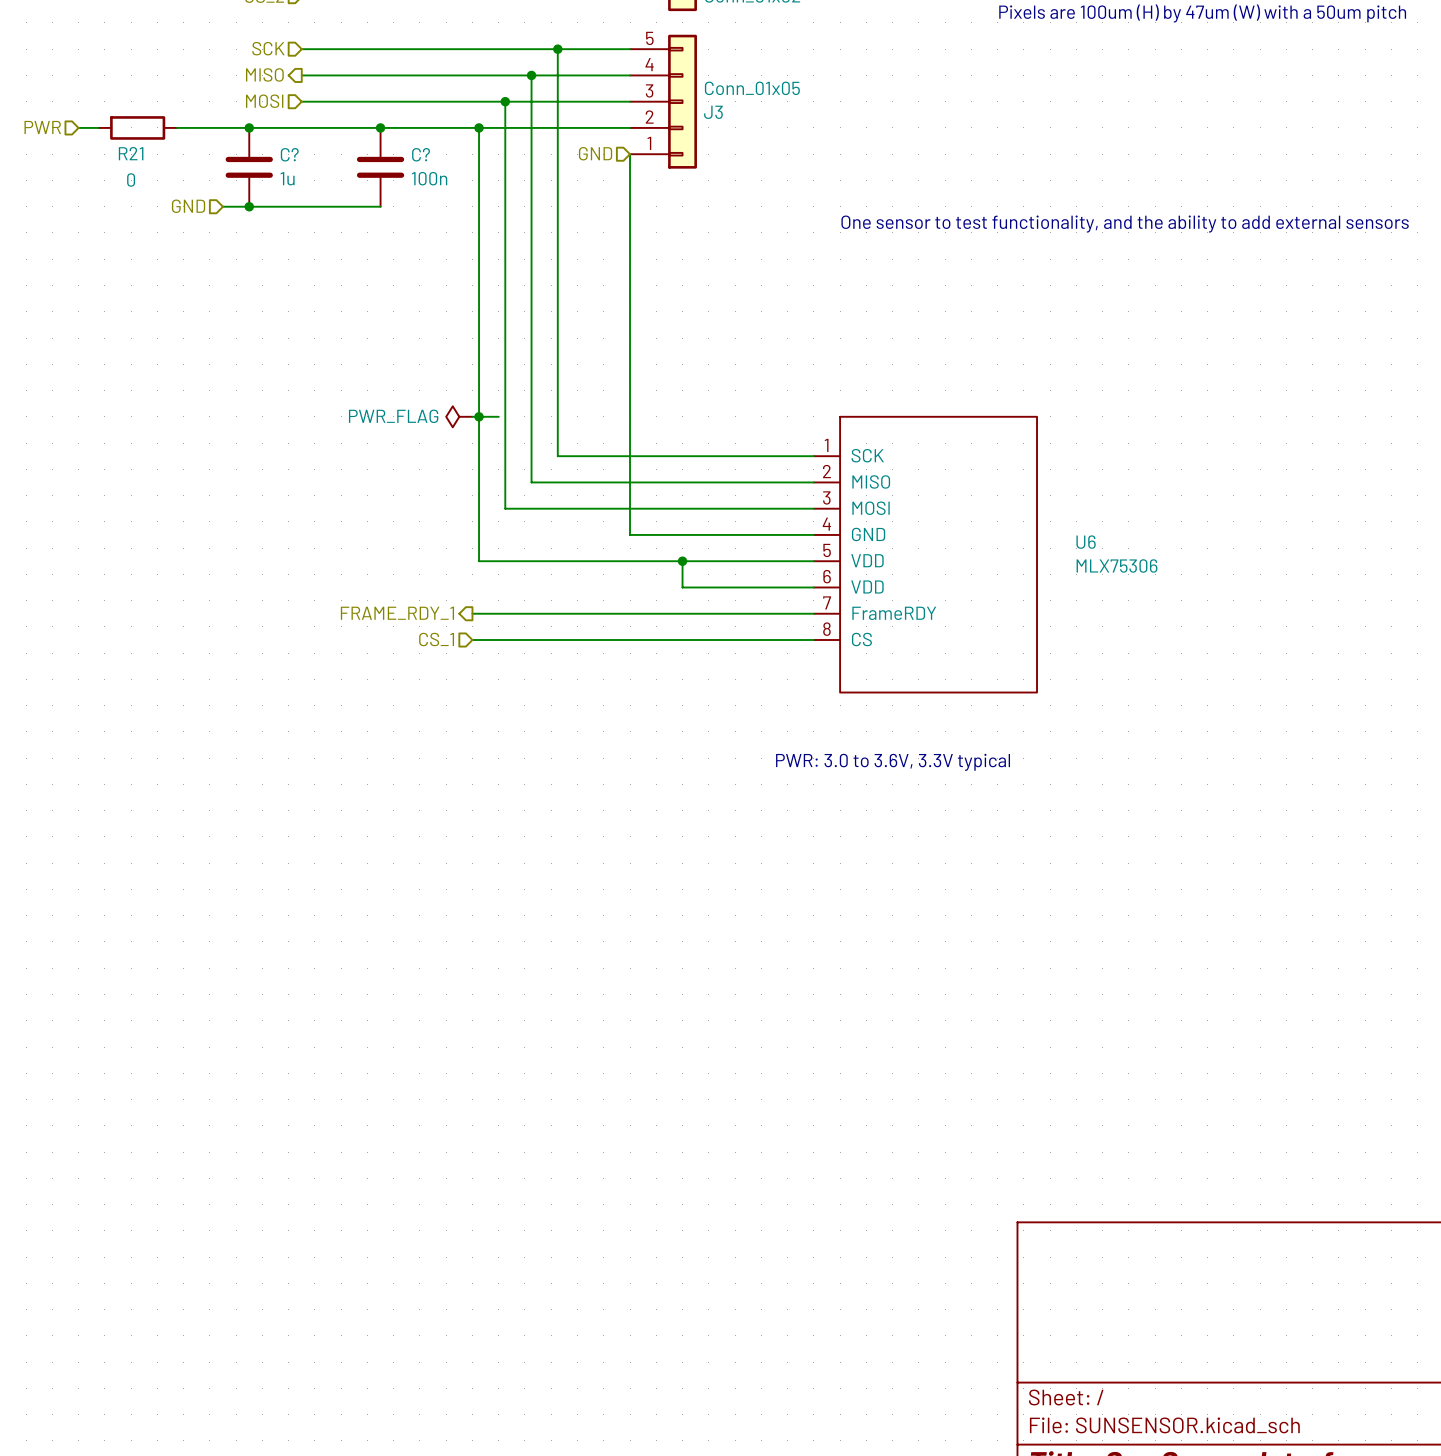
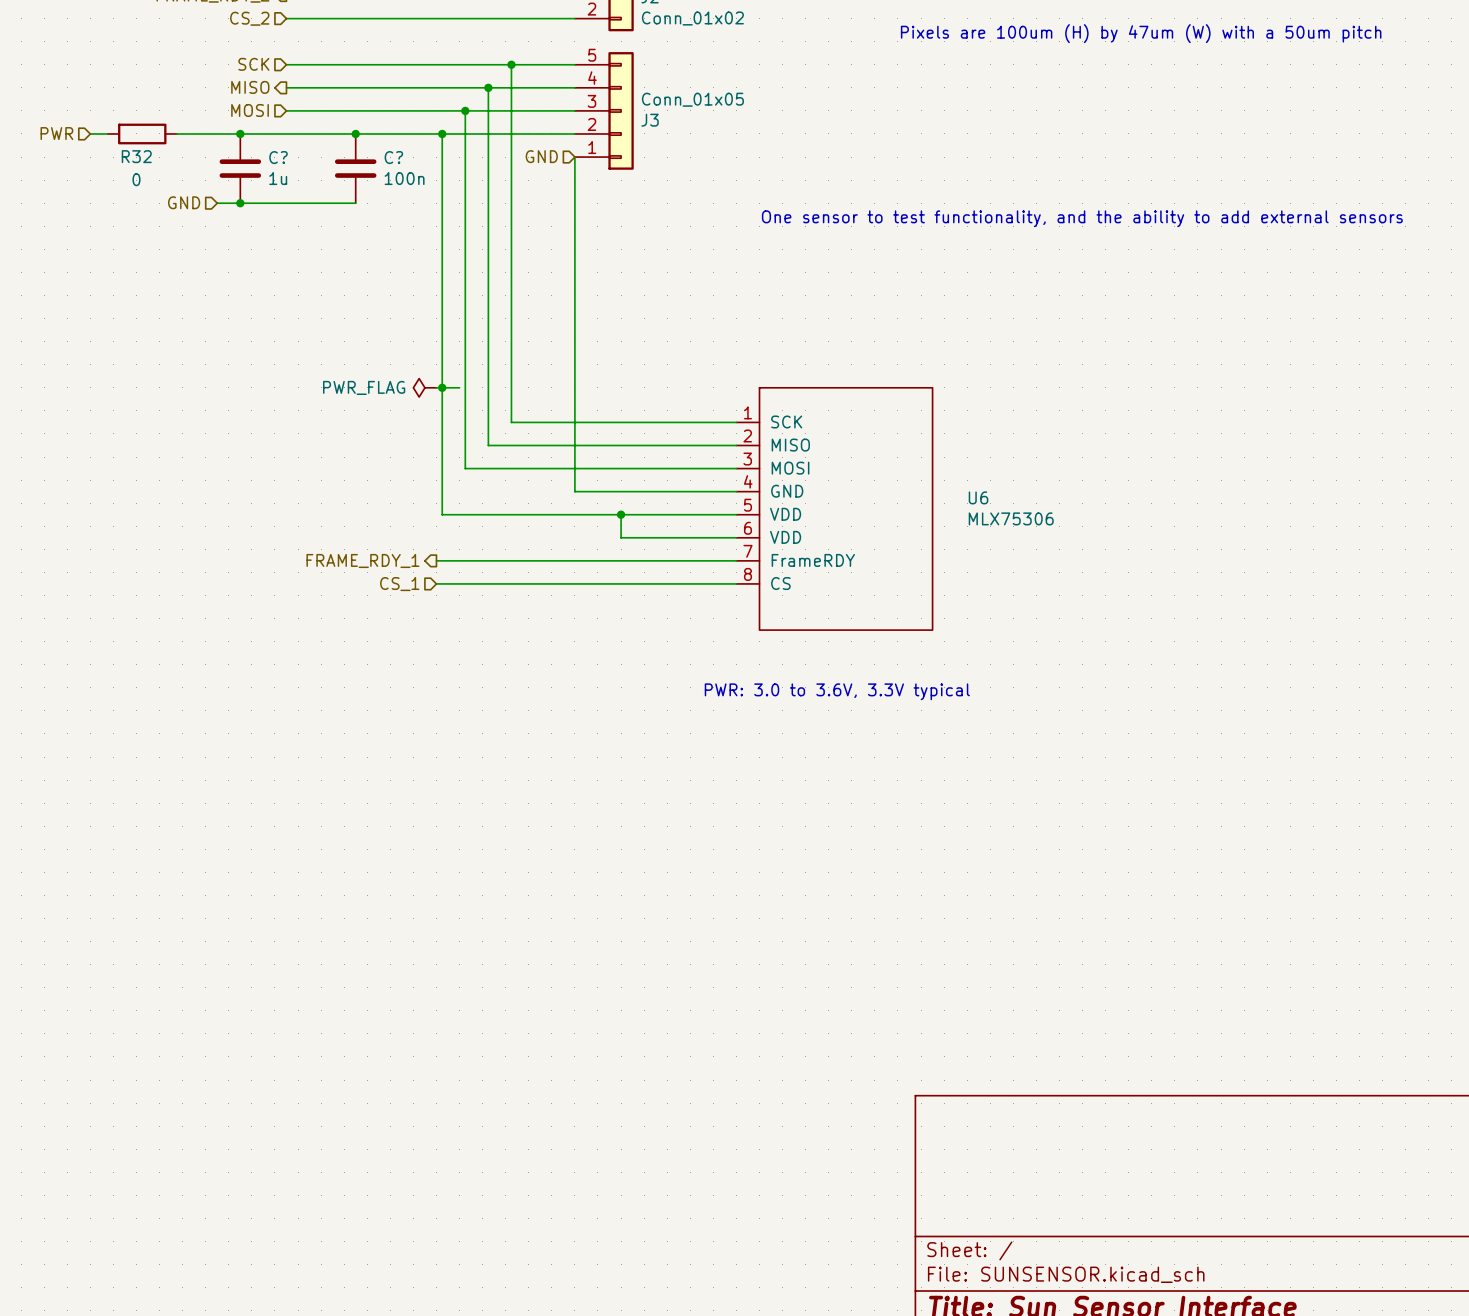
R21 name: R21 (131, 153) -> R32 (136, 156)

